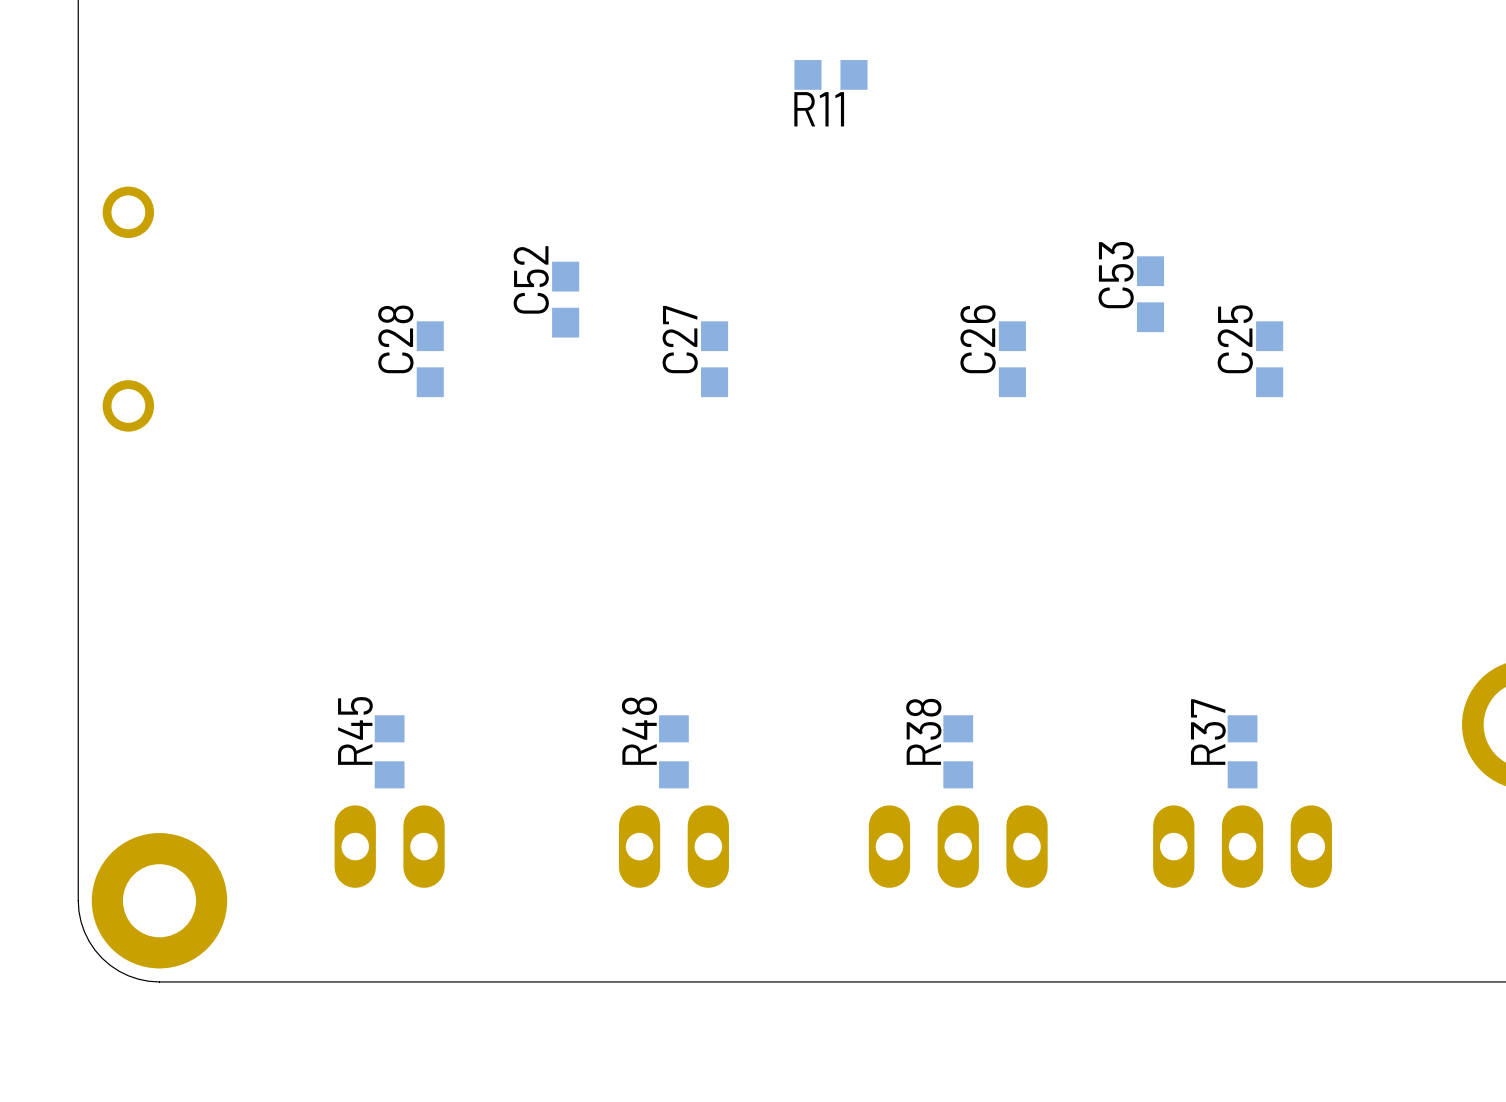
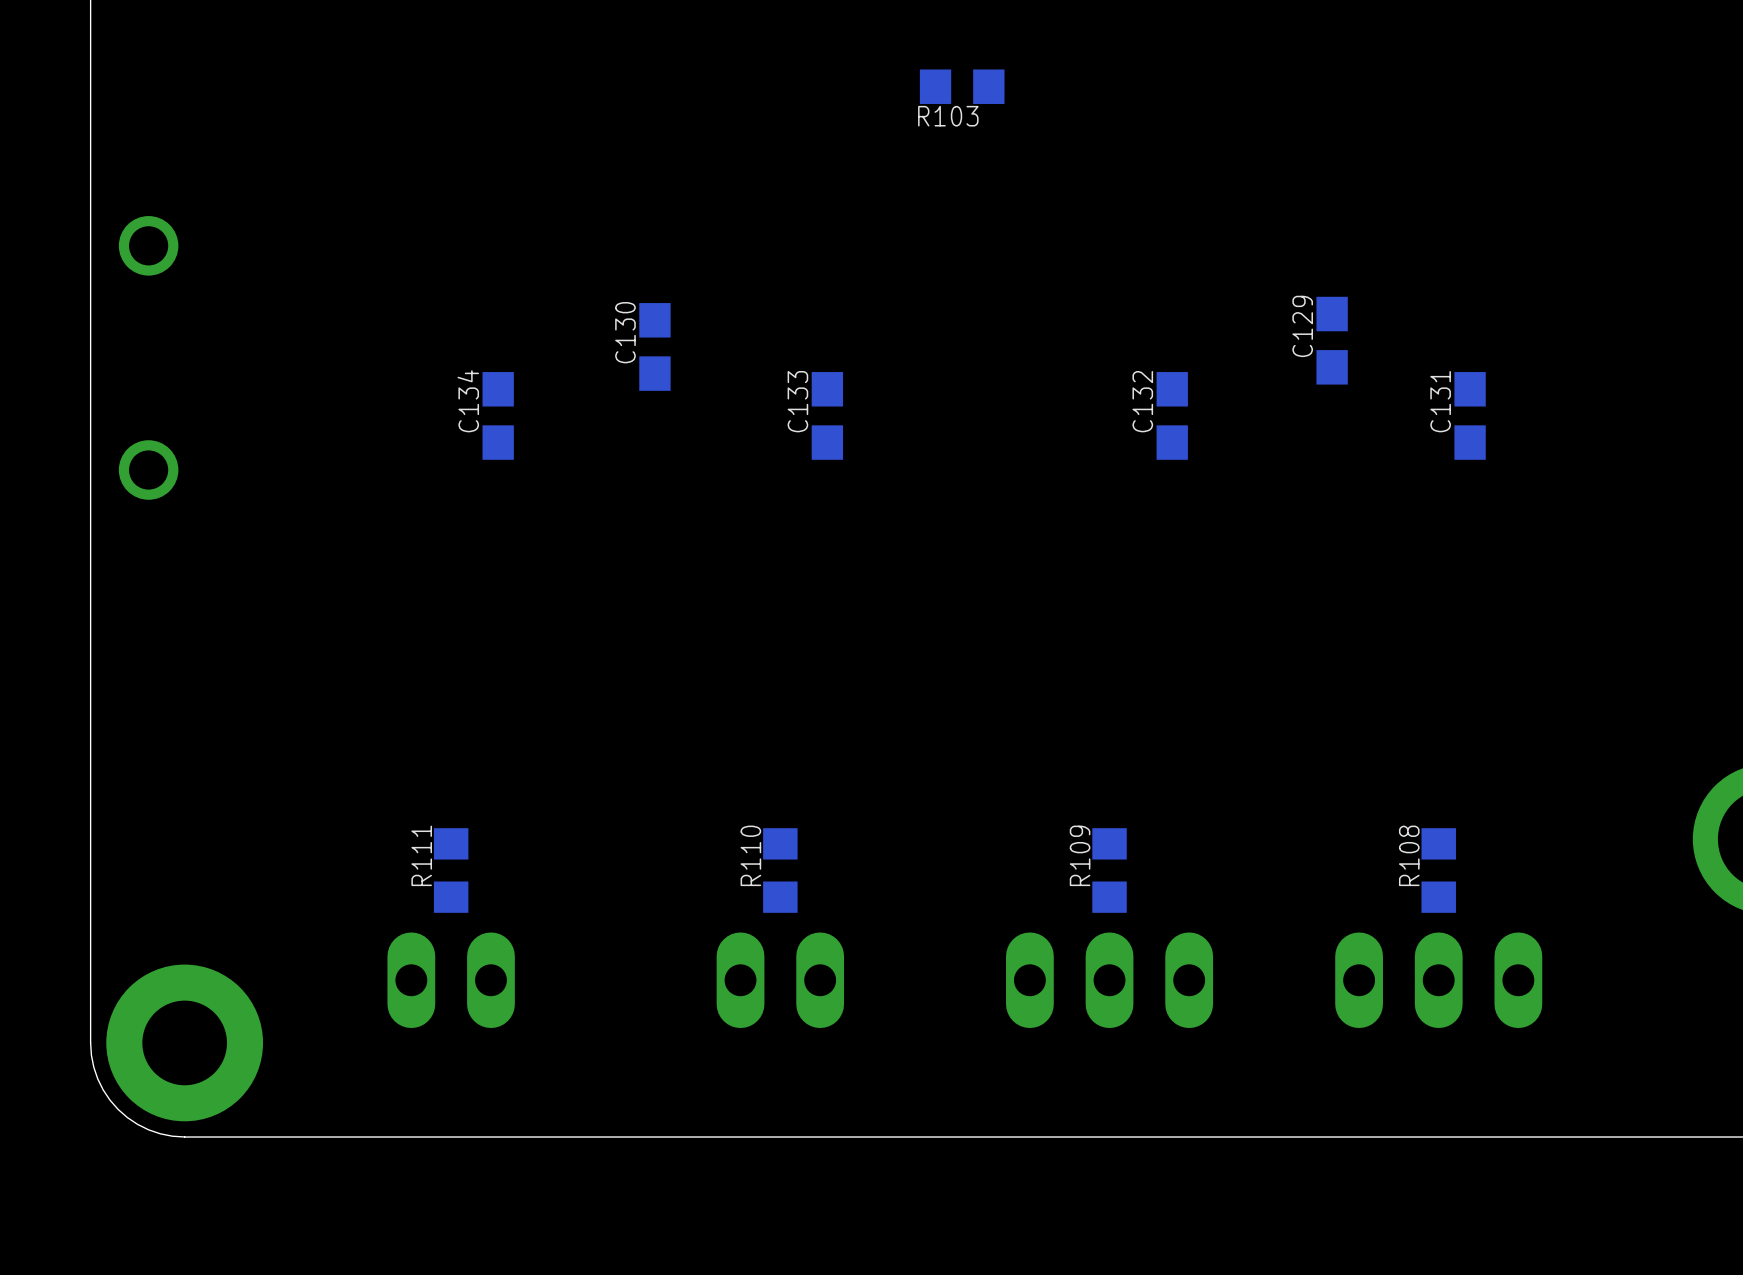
R11 name: R11 (819, 109) -> R103 (948, 116)
C53 name: C53 (1116, 275) -> C129 (1302, 326)
C52 name: C52 (531, 279) -> C130 (625, 332)
C28 name: C28 (395, 339) -> C134 (468, 401)
C27 name: C27 (680, 339) -> C133 (797, 401)
C26 name: C26 (978, 339) -> C132 (1142, 401)
C25 name: C25 (1235, 339) -> C131 (1440, 401)
R45 name: R45 (355, 730) -> R111 (421, 855)
R48 name: R48 (639, 731) -> R110 (750, 855)
R38 name: R38 (923, 731) -> R109 (1080, 855)
R37 name: R37 (1208, 732) -> R108 (1409, 855)

